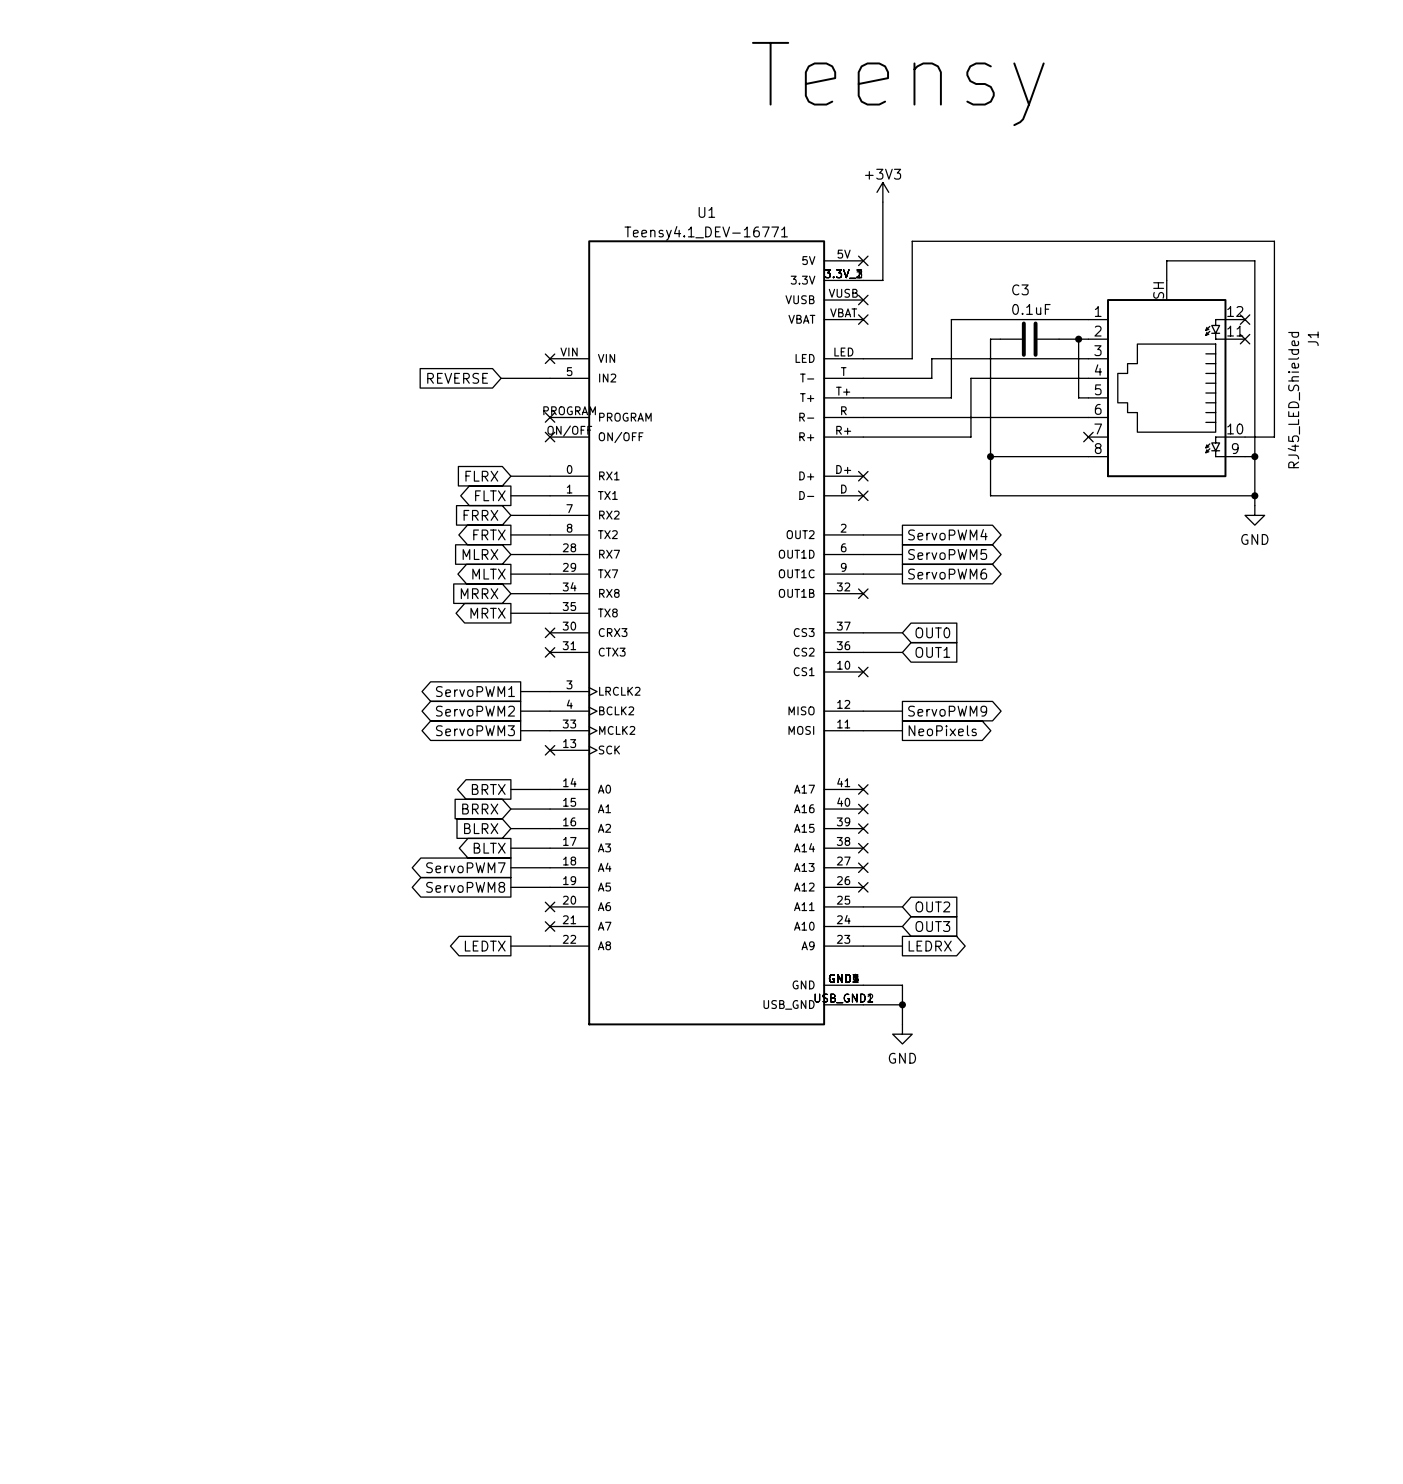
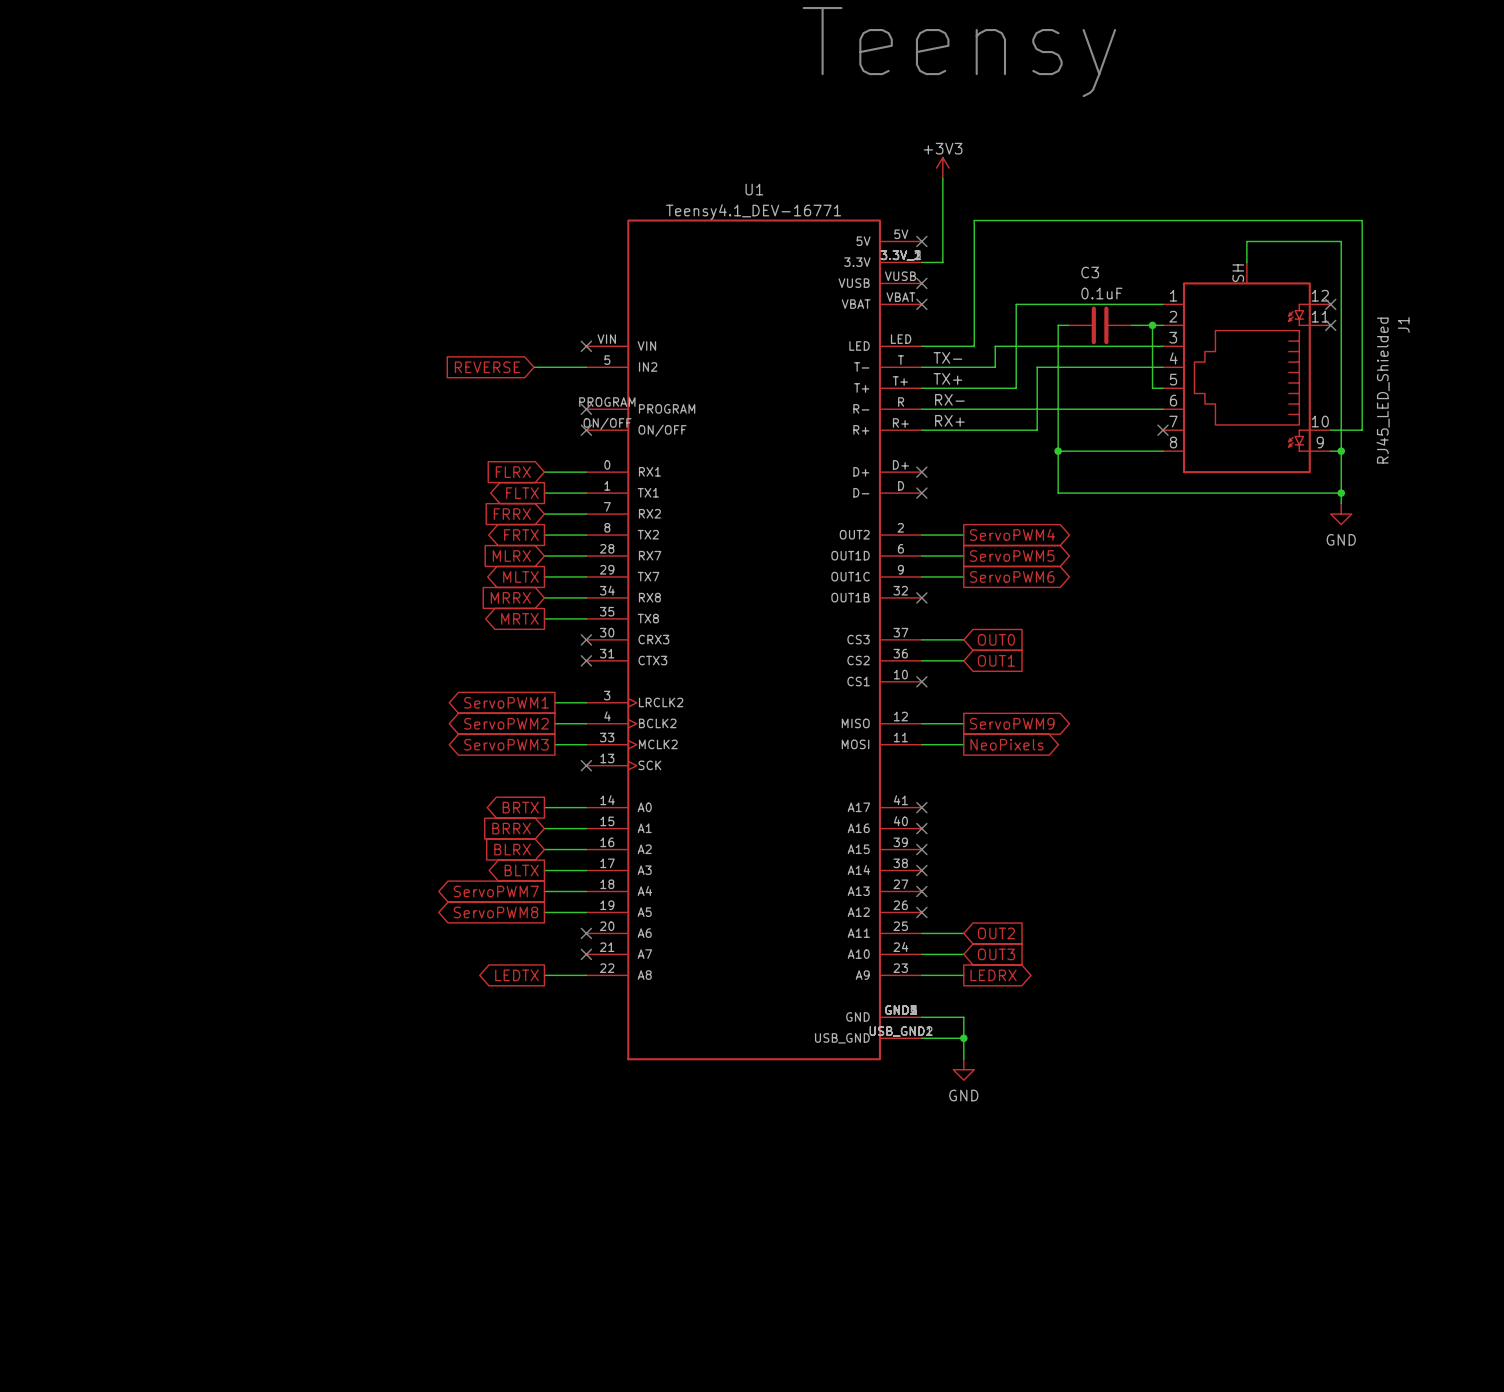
label: none -> TX- (947, 357)
label: none -> TX+ (947, 378)
label: none -> RX- (949, 399)
label: none -> RX+ (949, 420)

